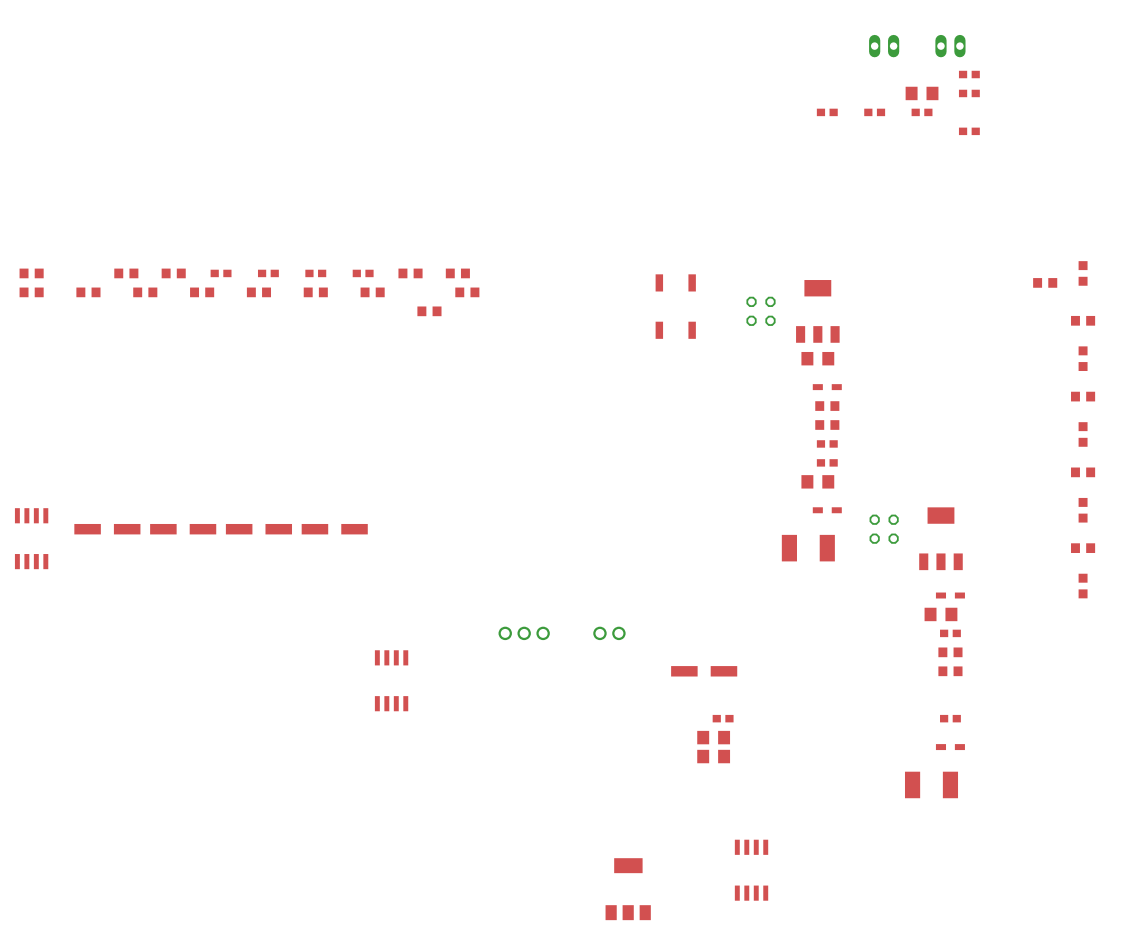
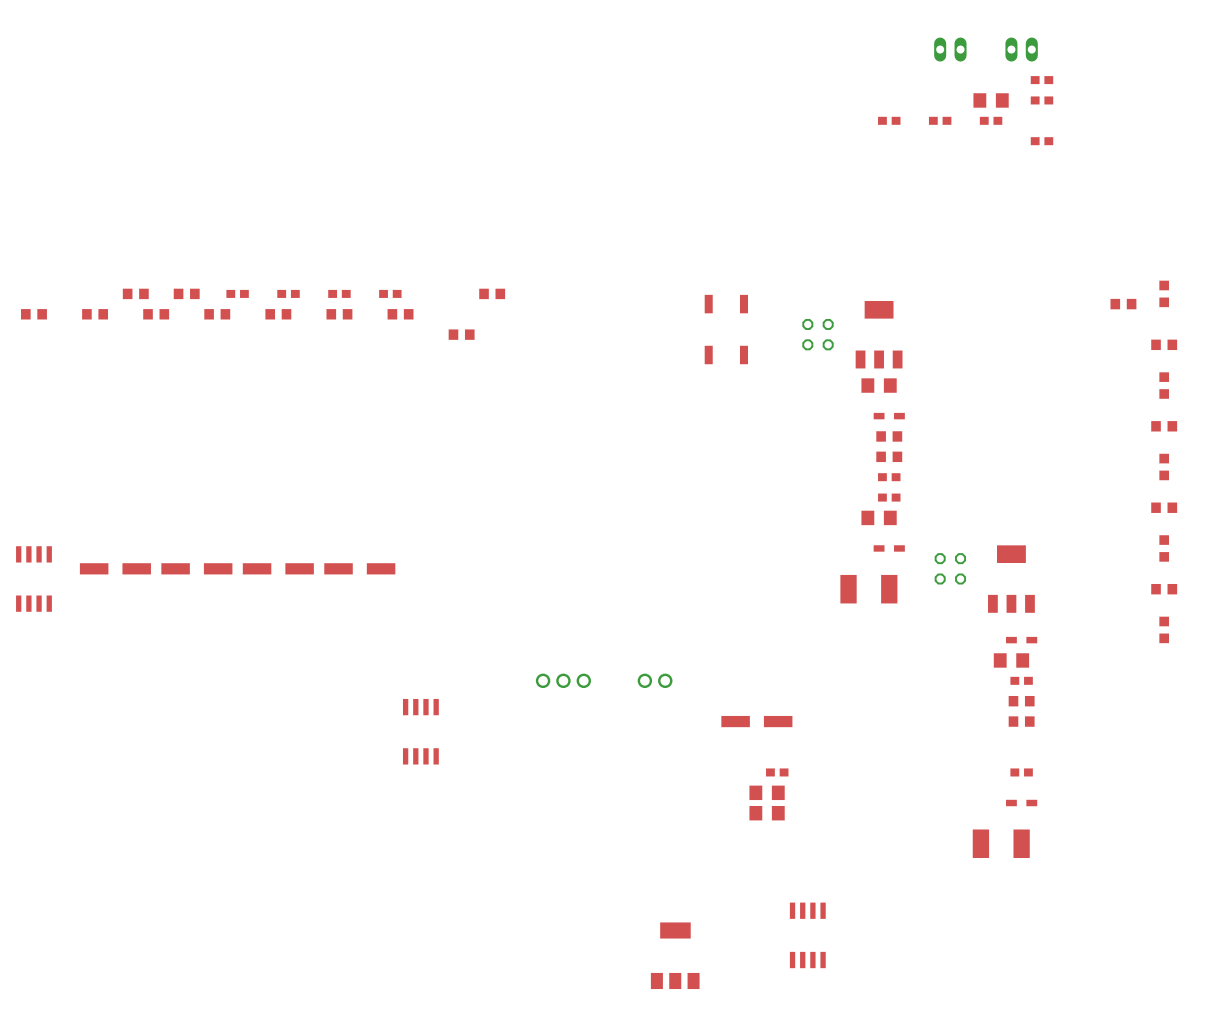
part: (31, 273) -> none
part: (410, 273) -> none
part: (467, 292) -> none

